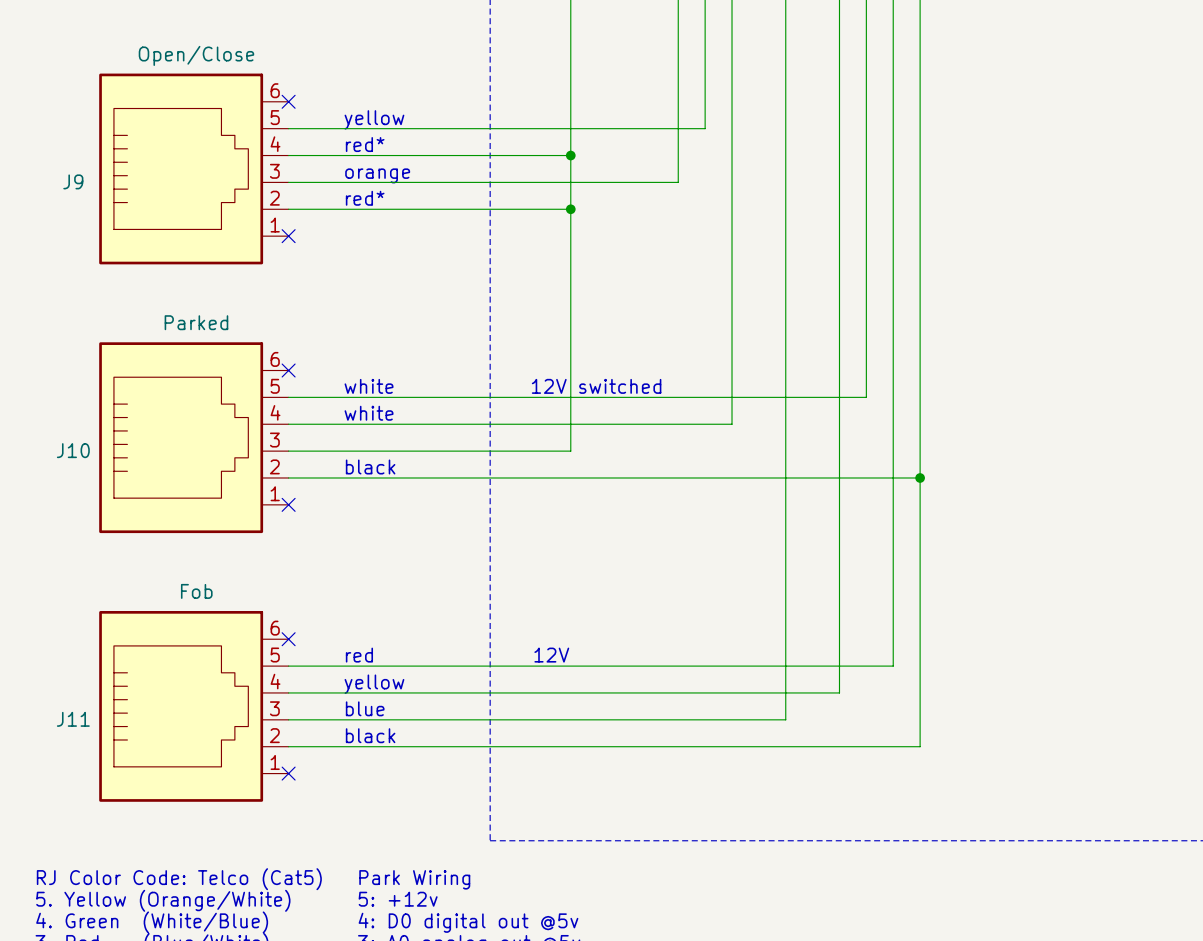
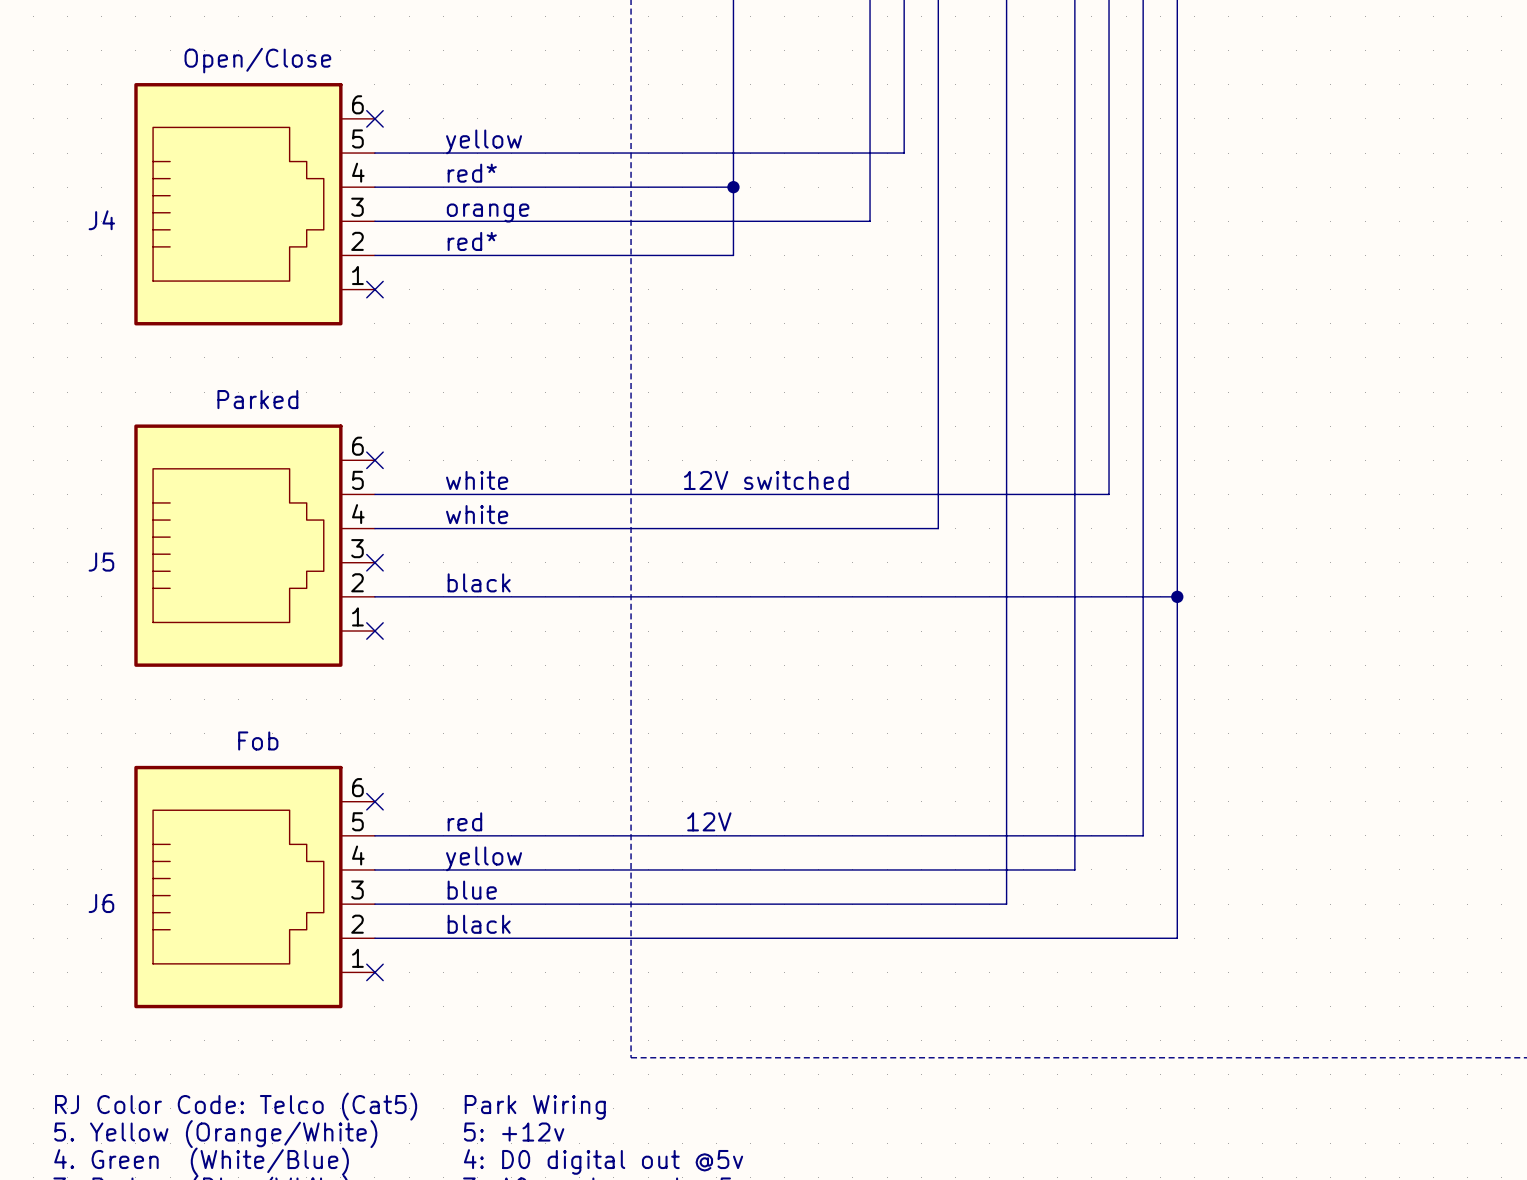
J9 name: J9 (73, 181) -> J4 (101, 220)
wire: (570, 209) (570, 451) (288, 451) -> none
junction: (570, 209) -> none
J10 name: J10 (73, 450) -> J5 (101, 562)
no-connect mark: none -> (374, 562)
J11 name: J11 (73, 719) -> J6 (101, 903)

